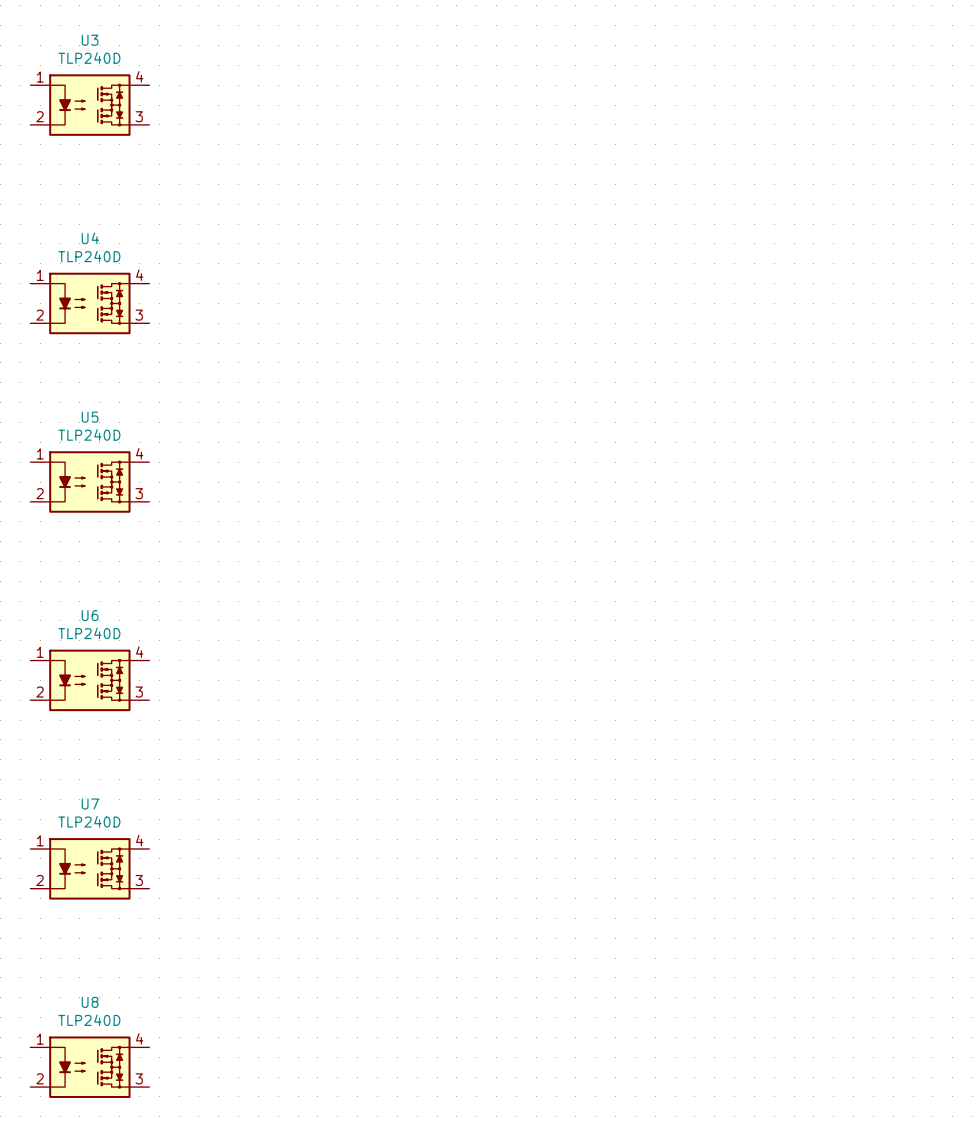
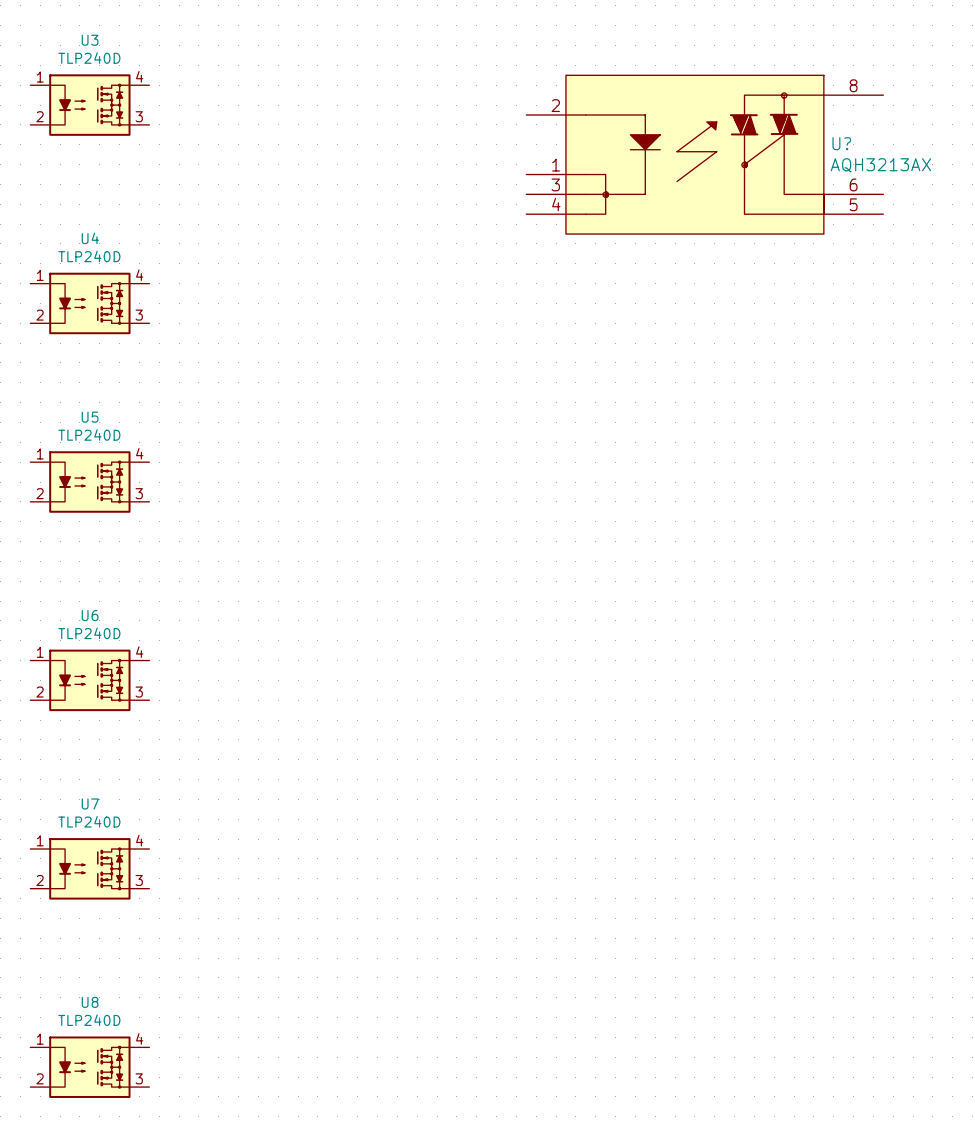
U?: none -> AQH3213AX (704, 154)

